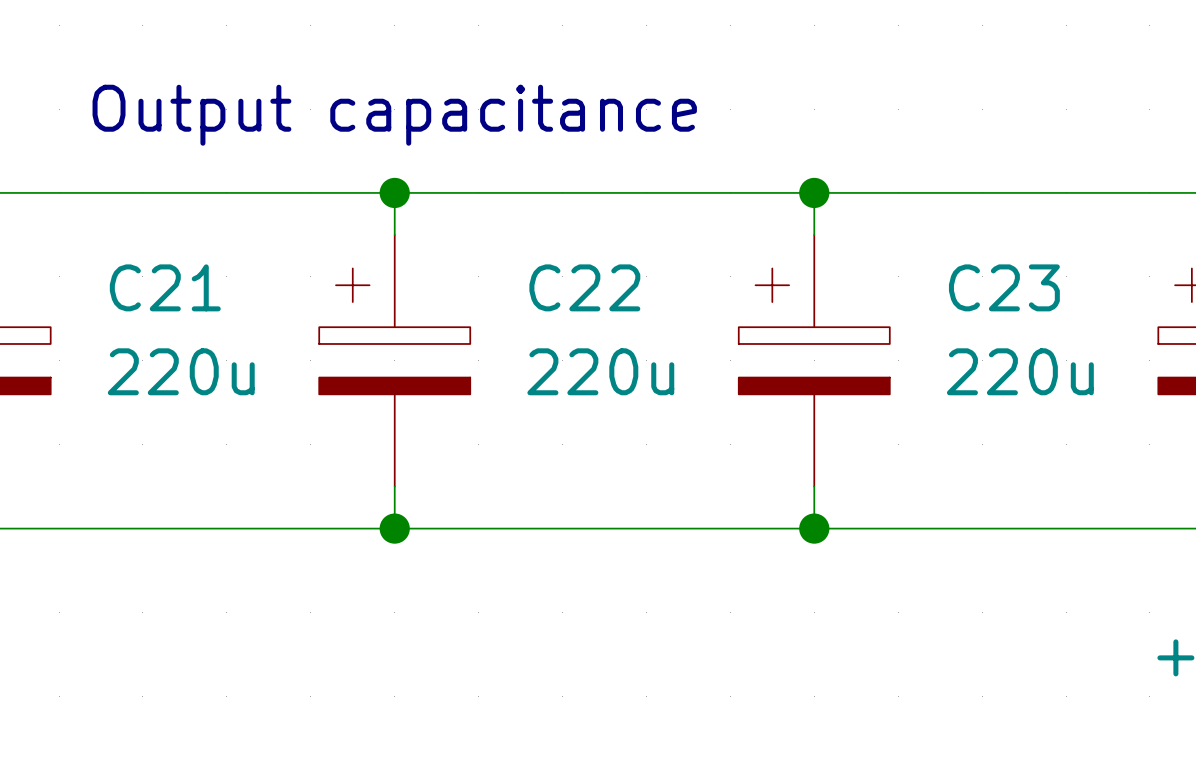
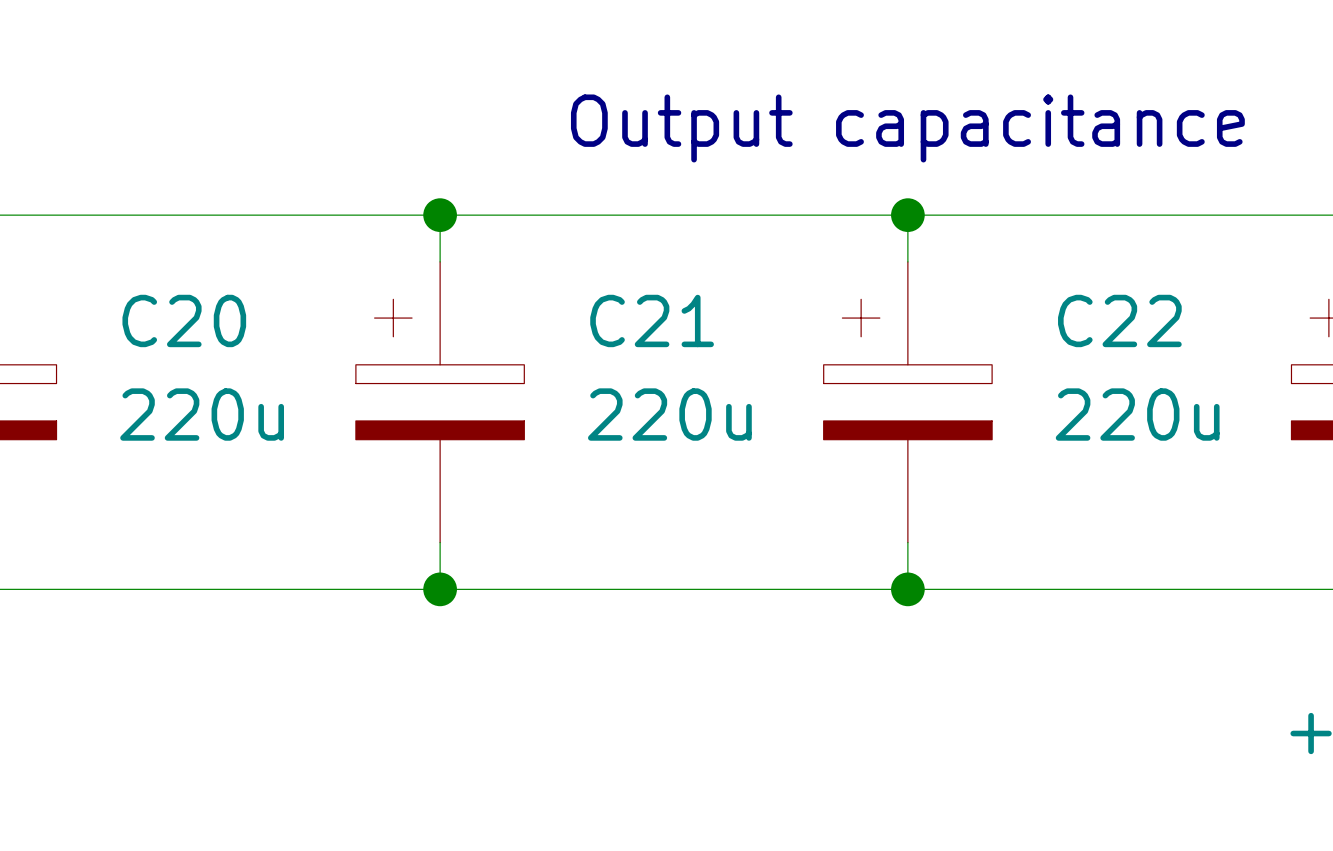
text position: Output capacitance (394, 115) -> Output capacitance (907, 128)
C21 name: C21 (165, 287) -> C20 (184, 320)
C22 name: C22 (584, 287) -> C21 (652, 320)
C23 name: C23 (1004, 287) -> C22 (1119, 320)

